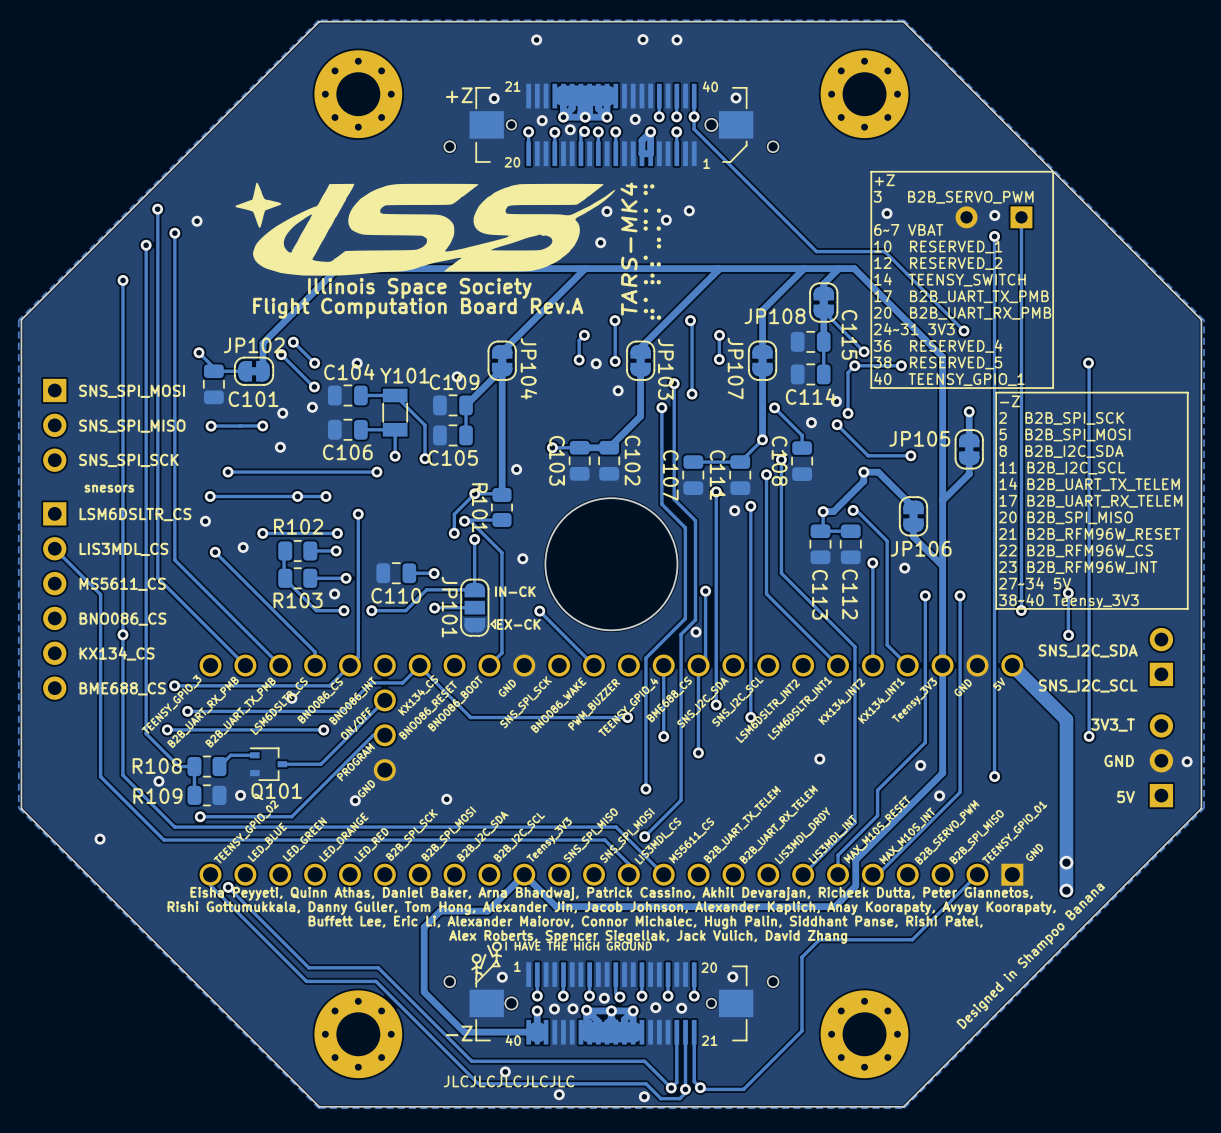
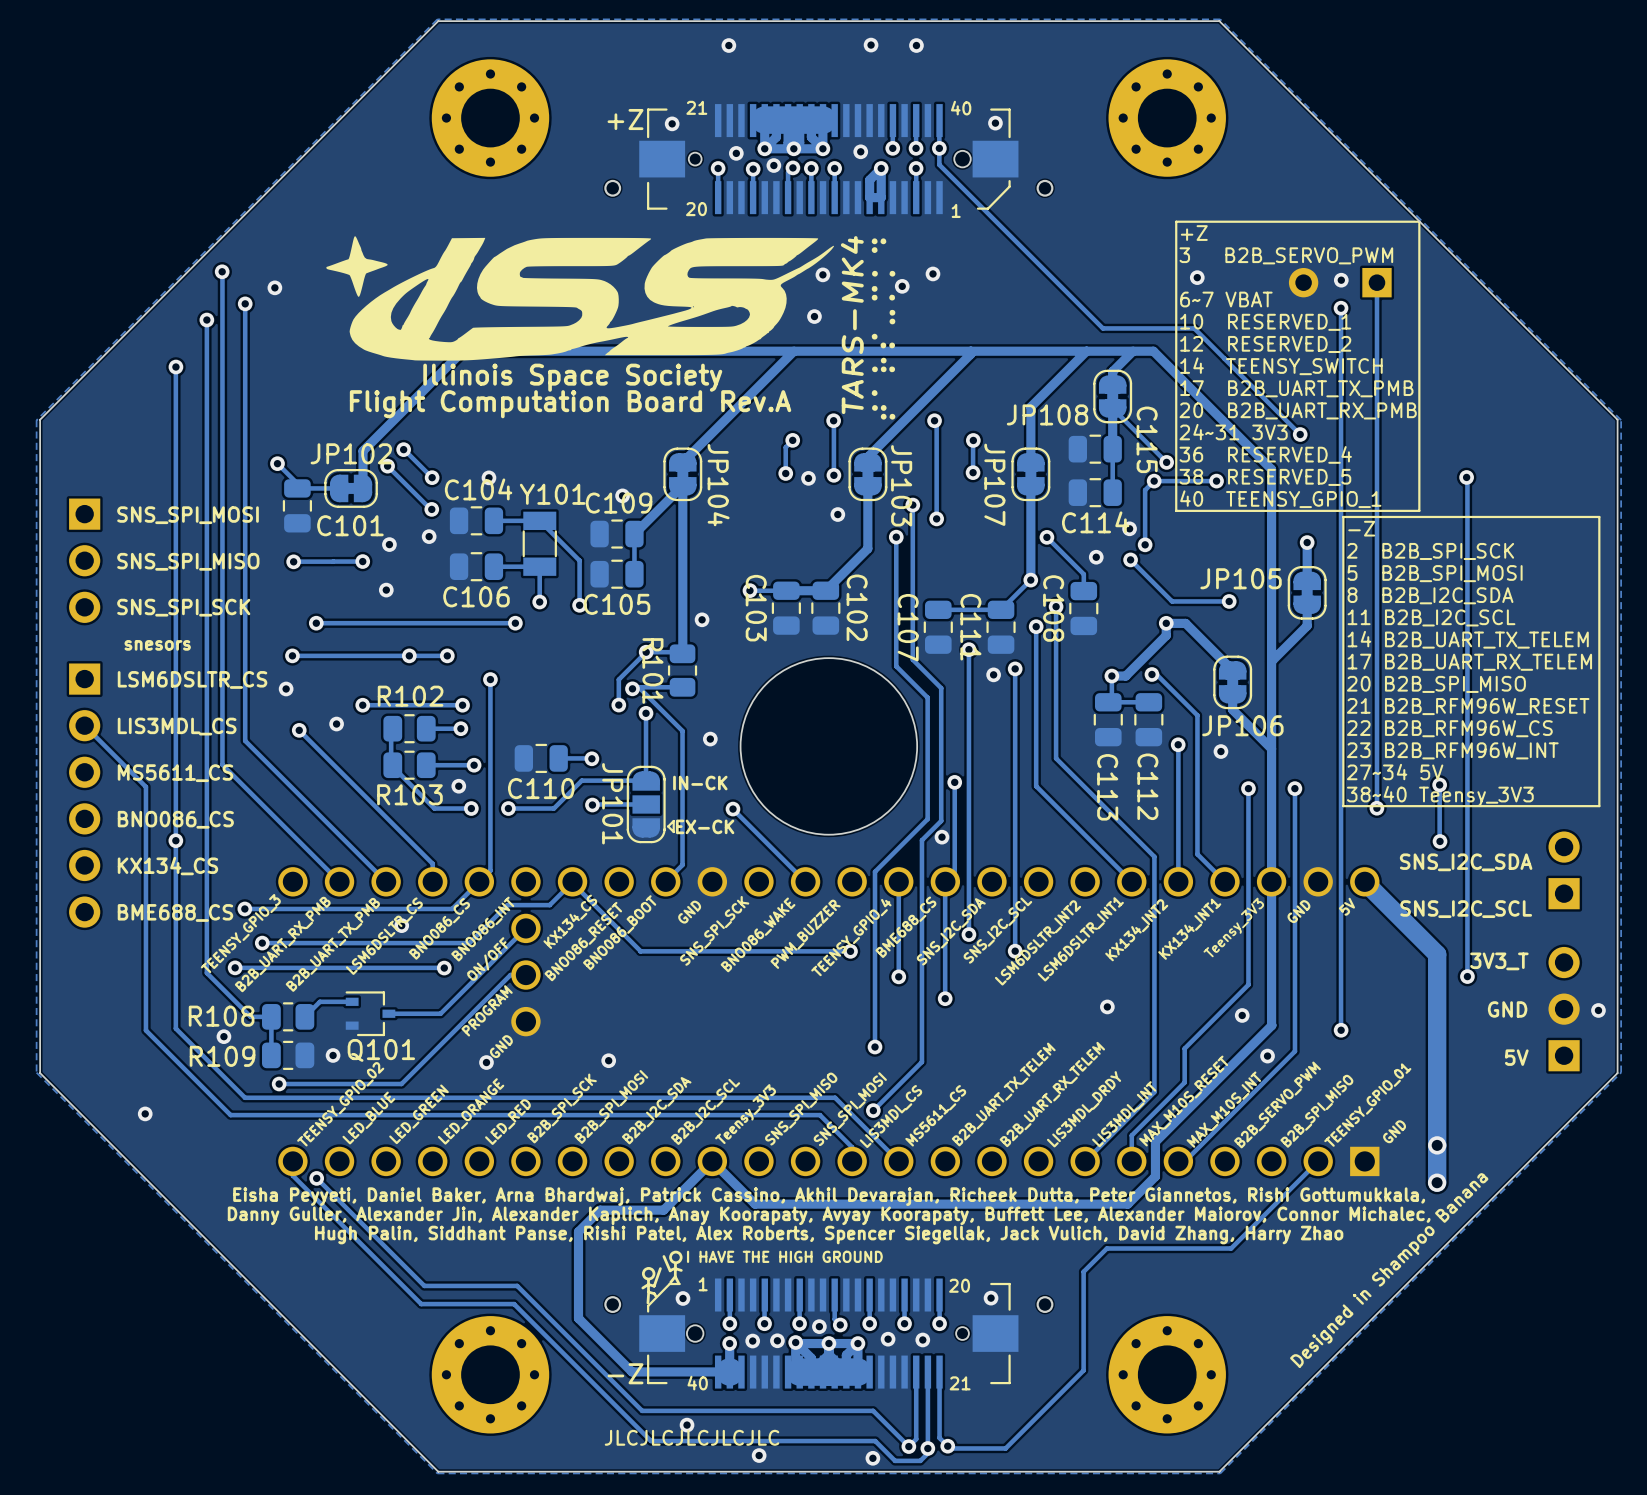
text: Eisha Peyyeti, Quinn Athas, Daniel Baker, Arna Bhardwaj, Patrick Cassino, Akhil Devarajan, Richeek Dutta, Peter Giannetos, (611, 893) -> Eisha Peyyeti, Daniel Baker, Arna Bhardwaj, Patrick Cassino, Akhil Devarajan, Richeek Dutta, Peter Giannetos, Rishi Gottumukkala, (829, 1196)
text: Rishi Gottumukkala, Danny Guller, Tom Hong, Alexander Jin, Jacob Johnson, Alexander Kaplich, Anay Koorapaty, Avyay Koorapaty, (611, 908) -> Danny Guller, Alexander Jin, Alexander Kaplich, Anay Koorapaty, Avyay Koorapaty, Buffett Lee, Alexander Maiorov, Connor Michalec, (829, 1215)
text: Buffett Lee, Eric Li, Alexander Maiorov, Connor Michalec, Hugh Palin, Siddhant Panse, Rishi Patel, (645, 922) -> none
text: Alex Roberts, Spencer Siegellak, Jack Vulich, David Zhang (648, 936) -> Hugh Palin, Siddhant Panse, Rishi Patel, Alex Roberts, Spencer Siegellak, Jack Vulich, David Zhang, Harry Zhao (829, 1235)

